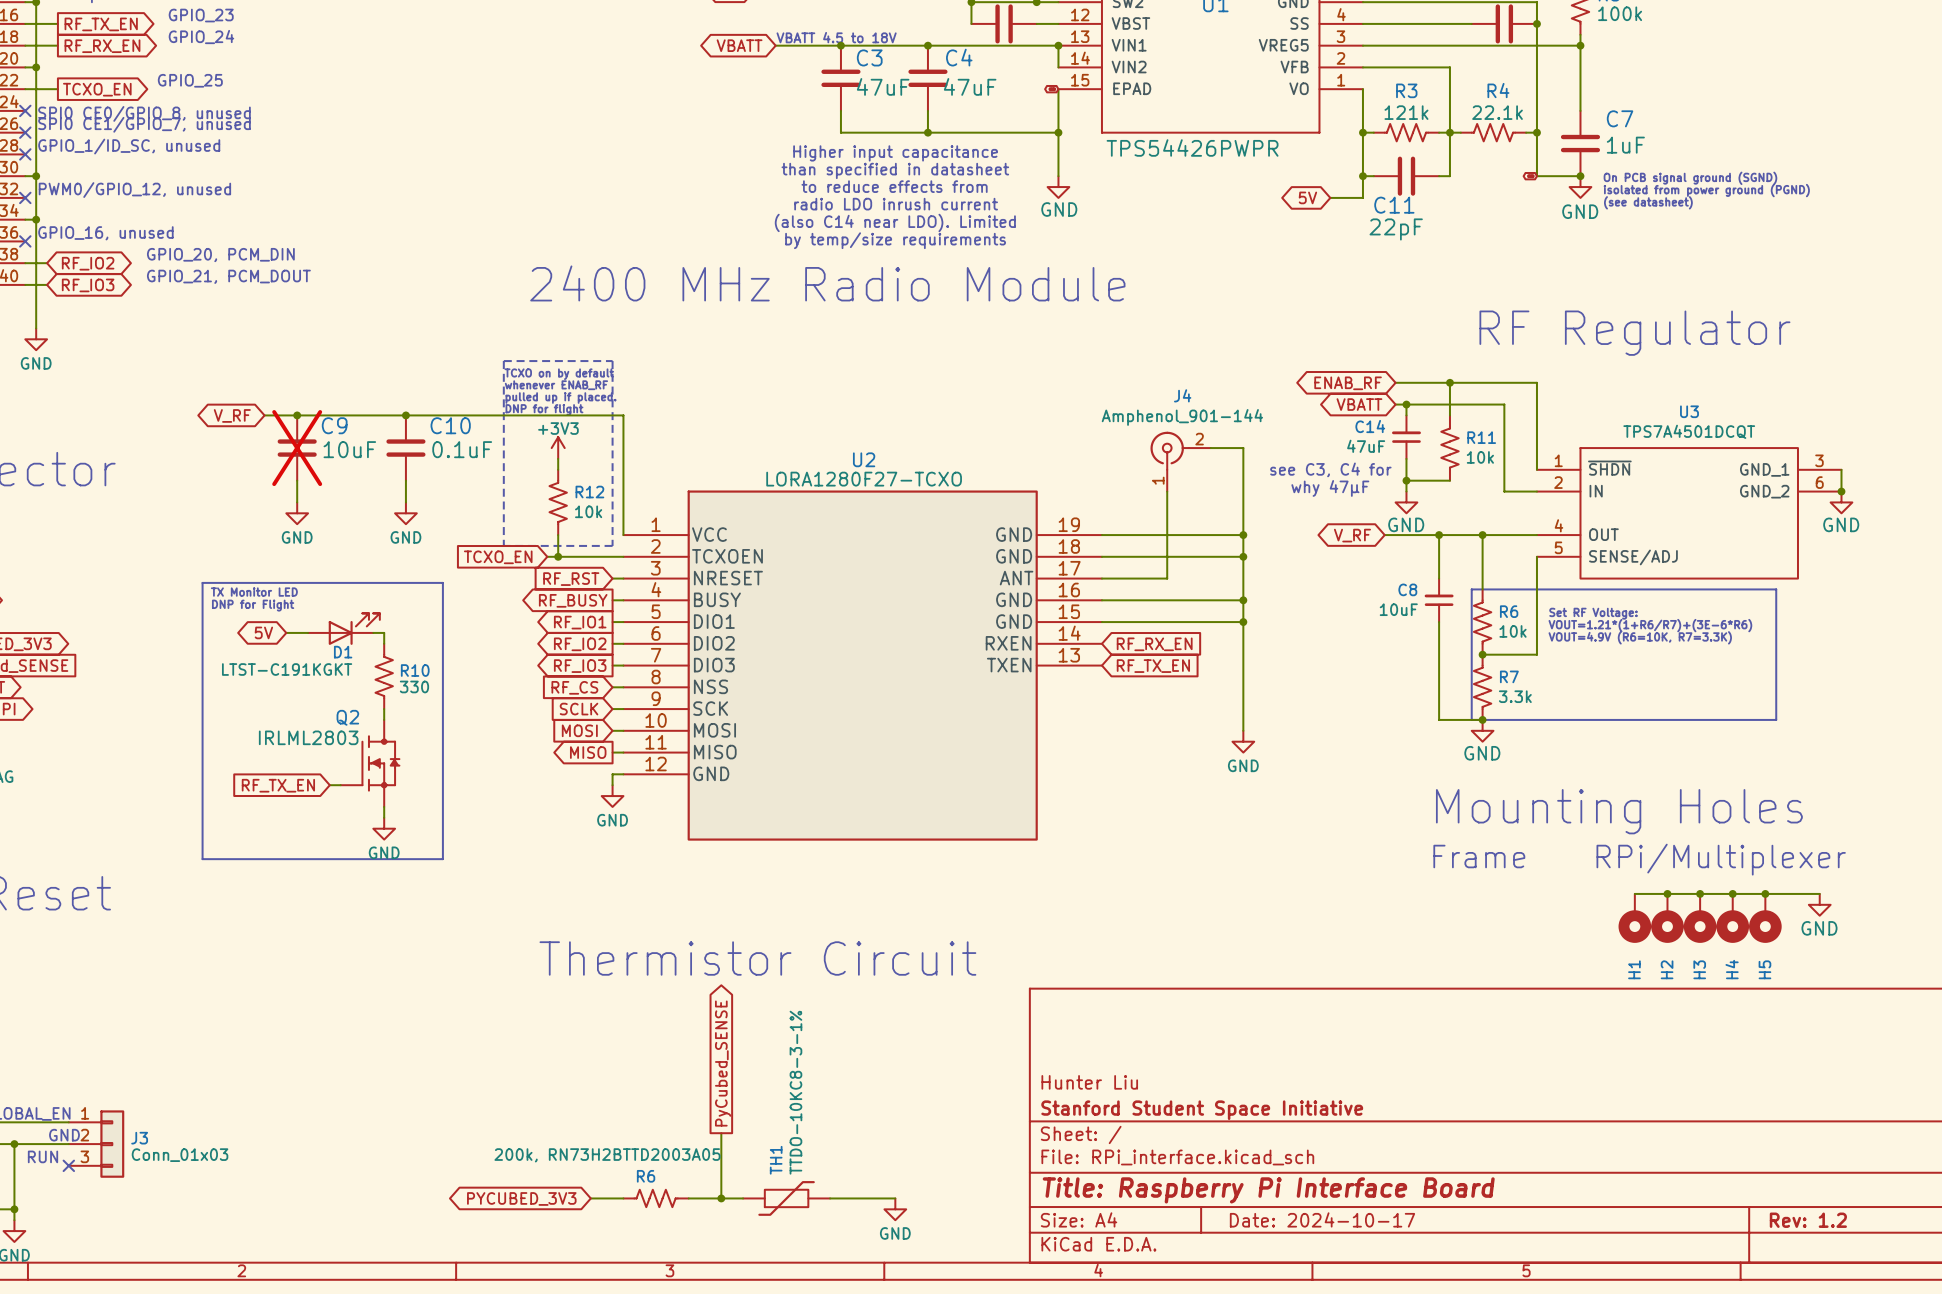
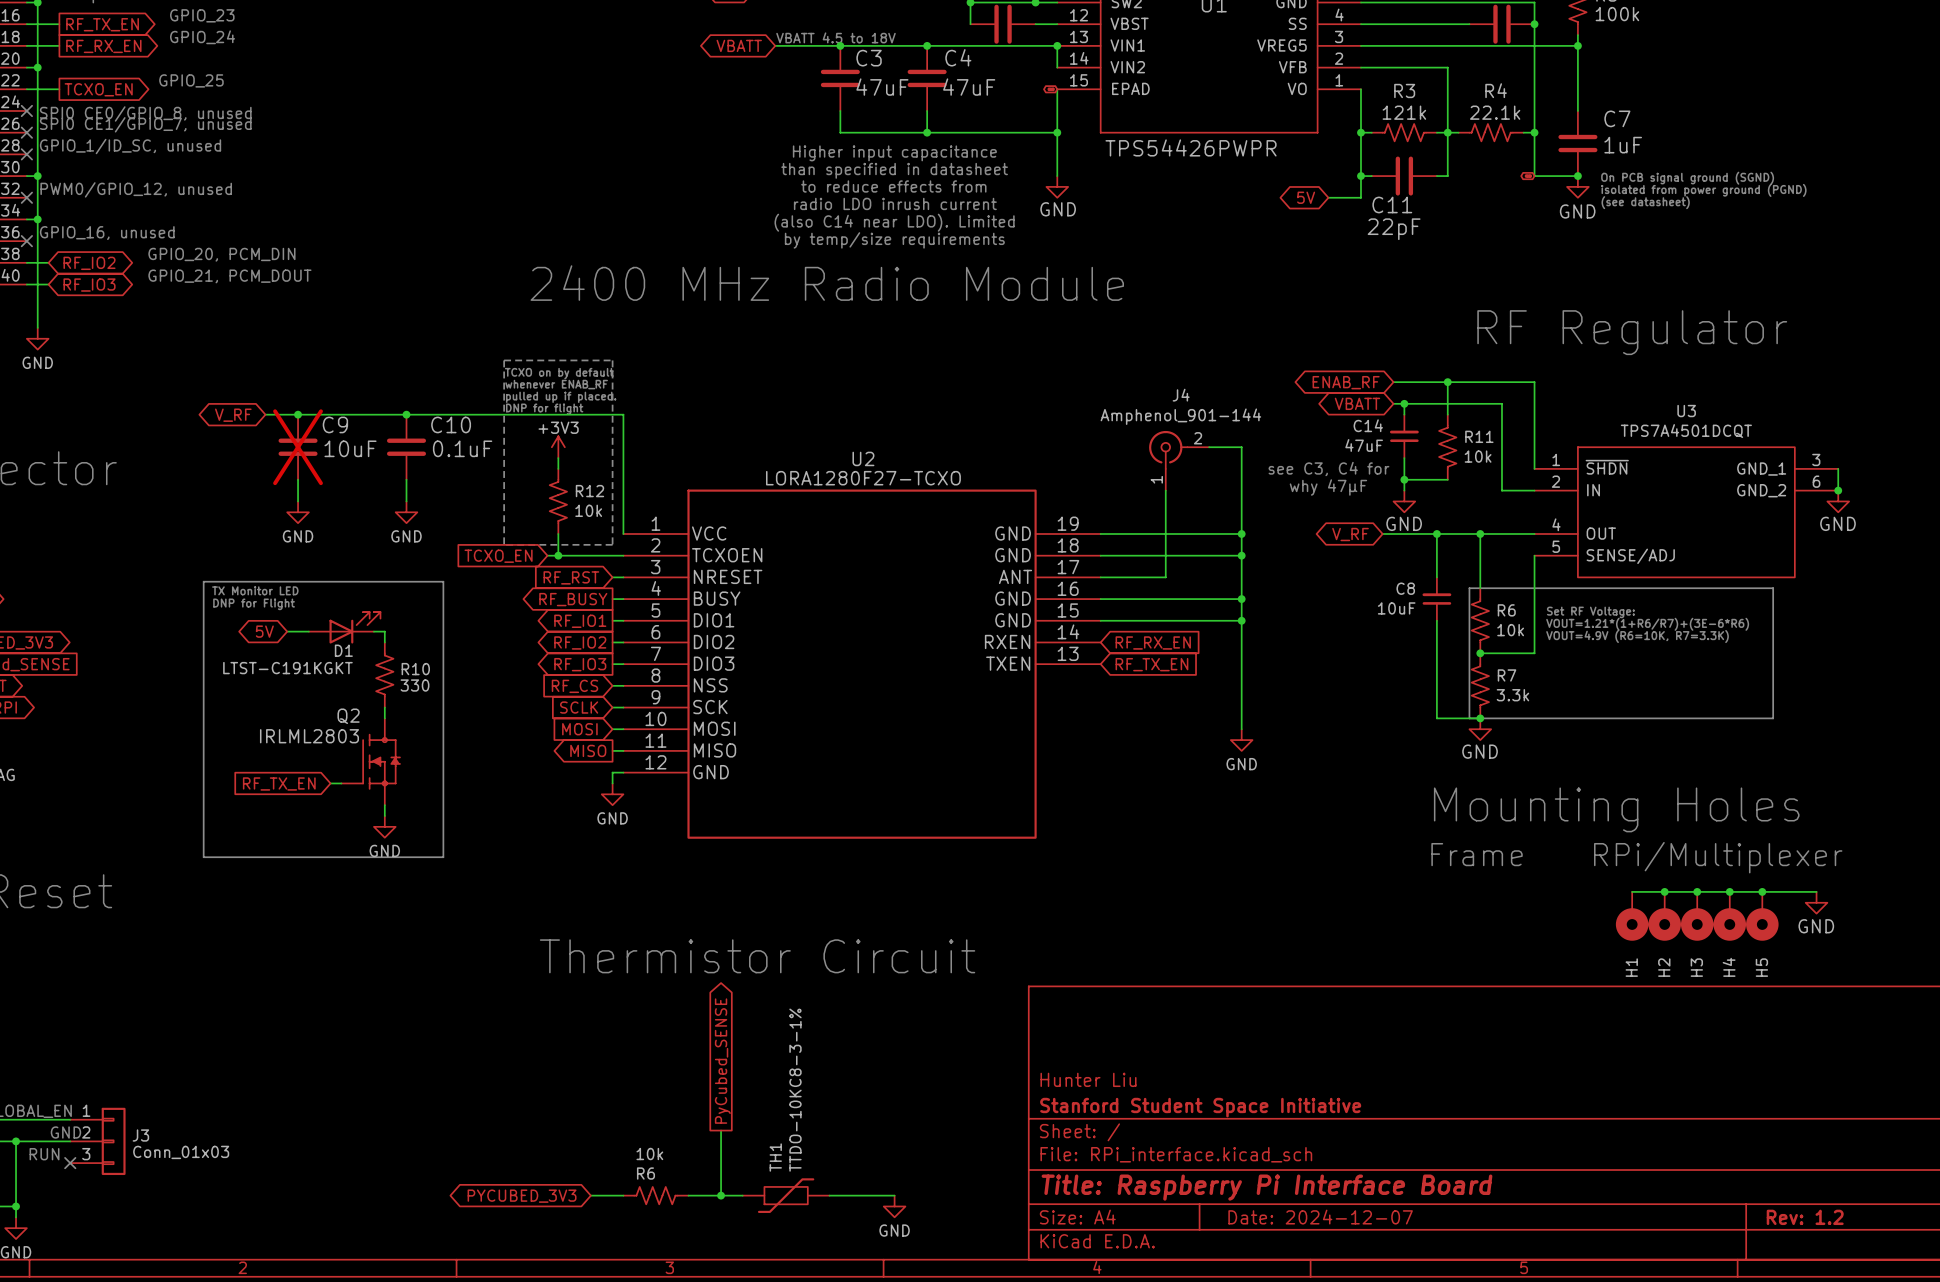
R6 value: 200k, RN73H2BTTD2003A05 (607, 1155) -> 10k (649, 1154)
title block: Date: 2024-10-17 (1322, 1219) -> Date: 2024-12-07 (1320, 1217)

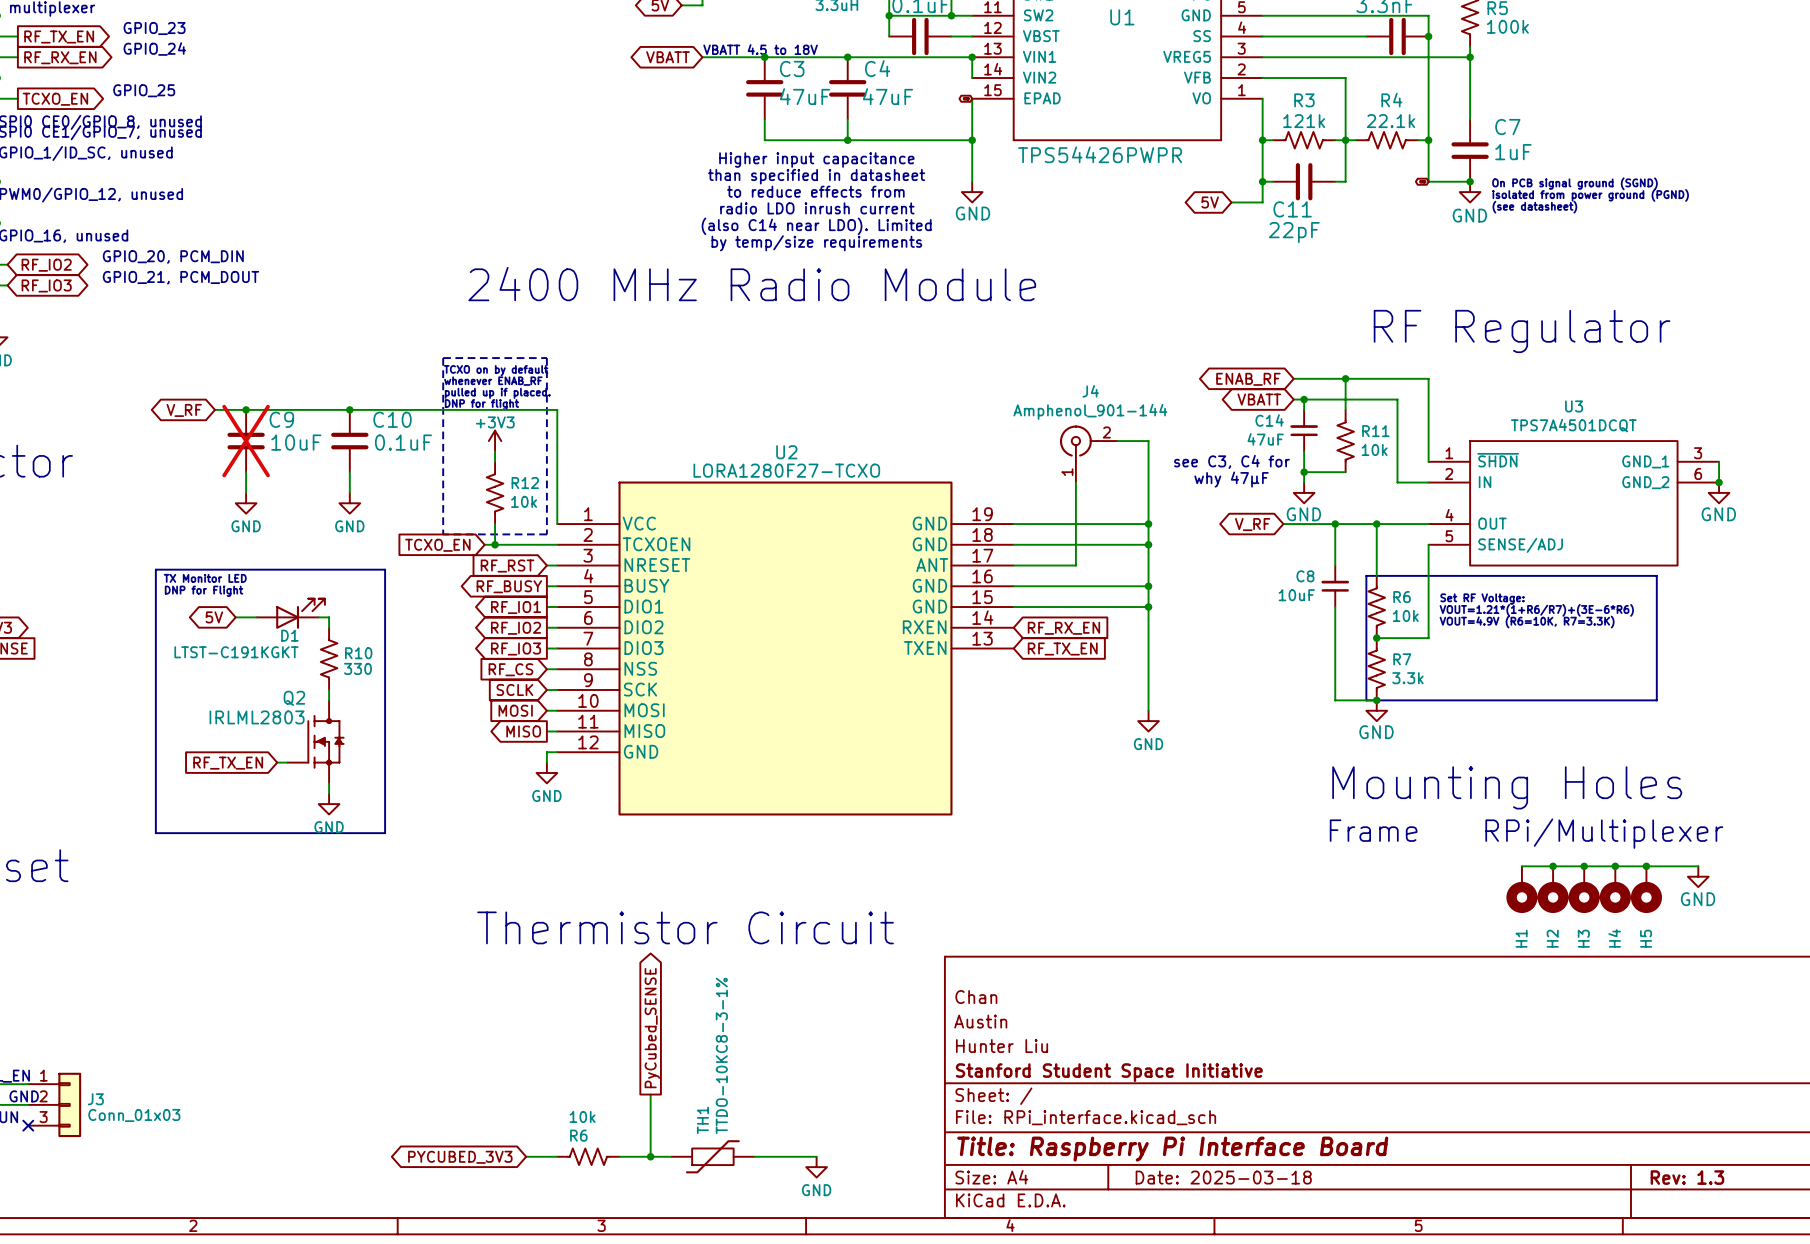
title block: none -> Chan (976, 997)
title block: none -> Austin (980, 1021)
title block: Date: 2024-12-07 (1320, 1217) -> Date: 2025-03-18 (1223, 1177)
title block: Rev: 1.2 (1805, 1217) -> Rev: 1.3 (1687, 1177)

